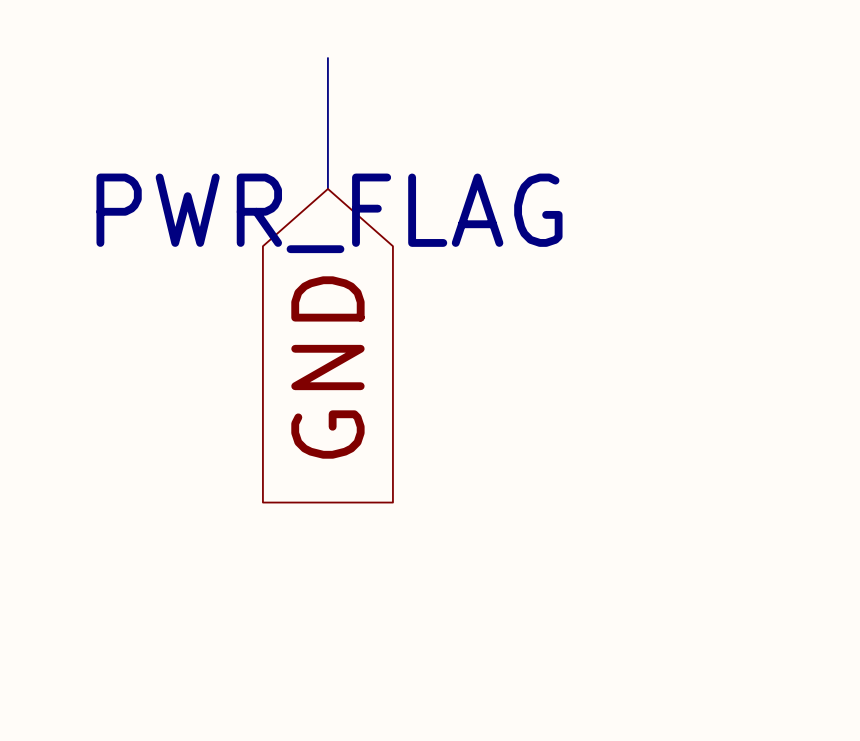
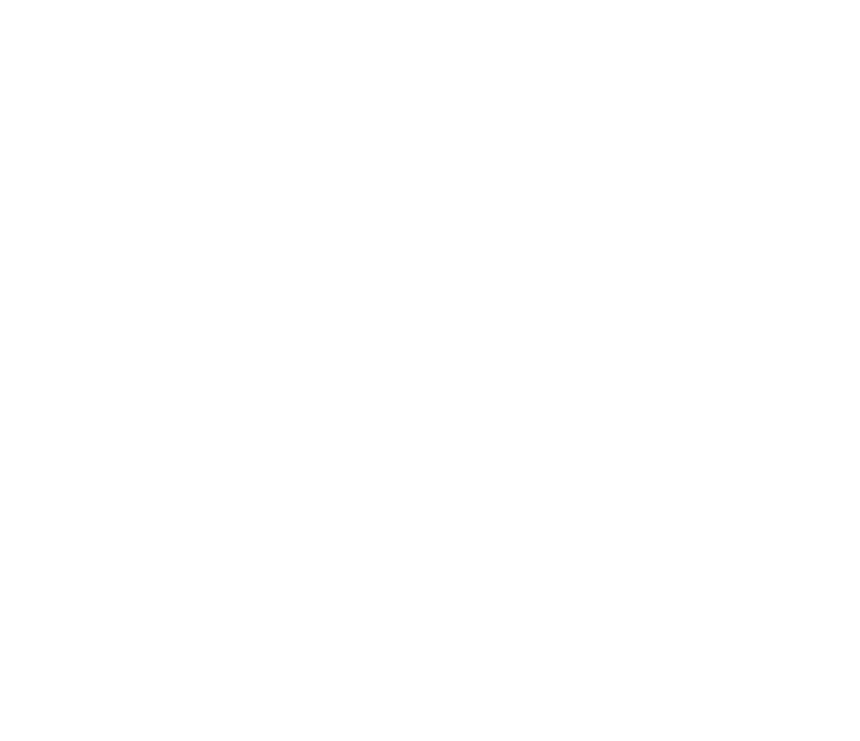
wire: (327, 58) (327, 188) -> none
power symbol: PWR_FLAG (329, 213) -> none
global label: GND (327, 367) -> none

